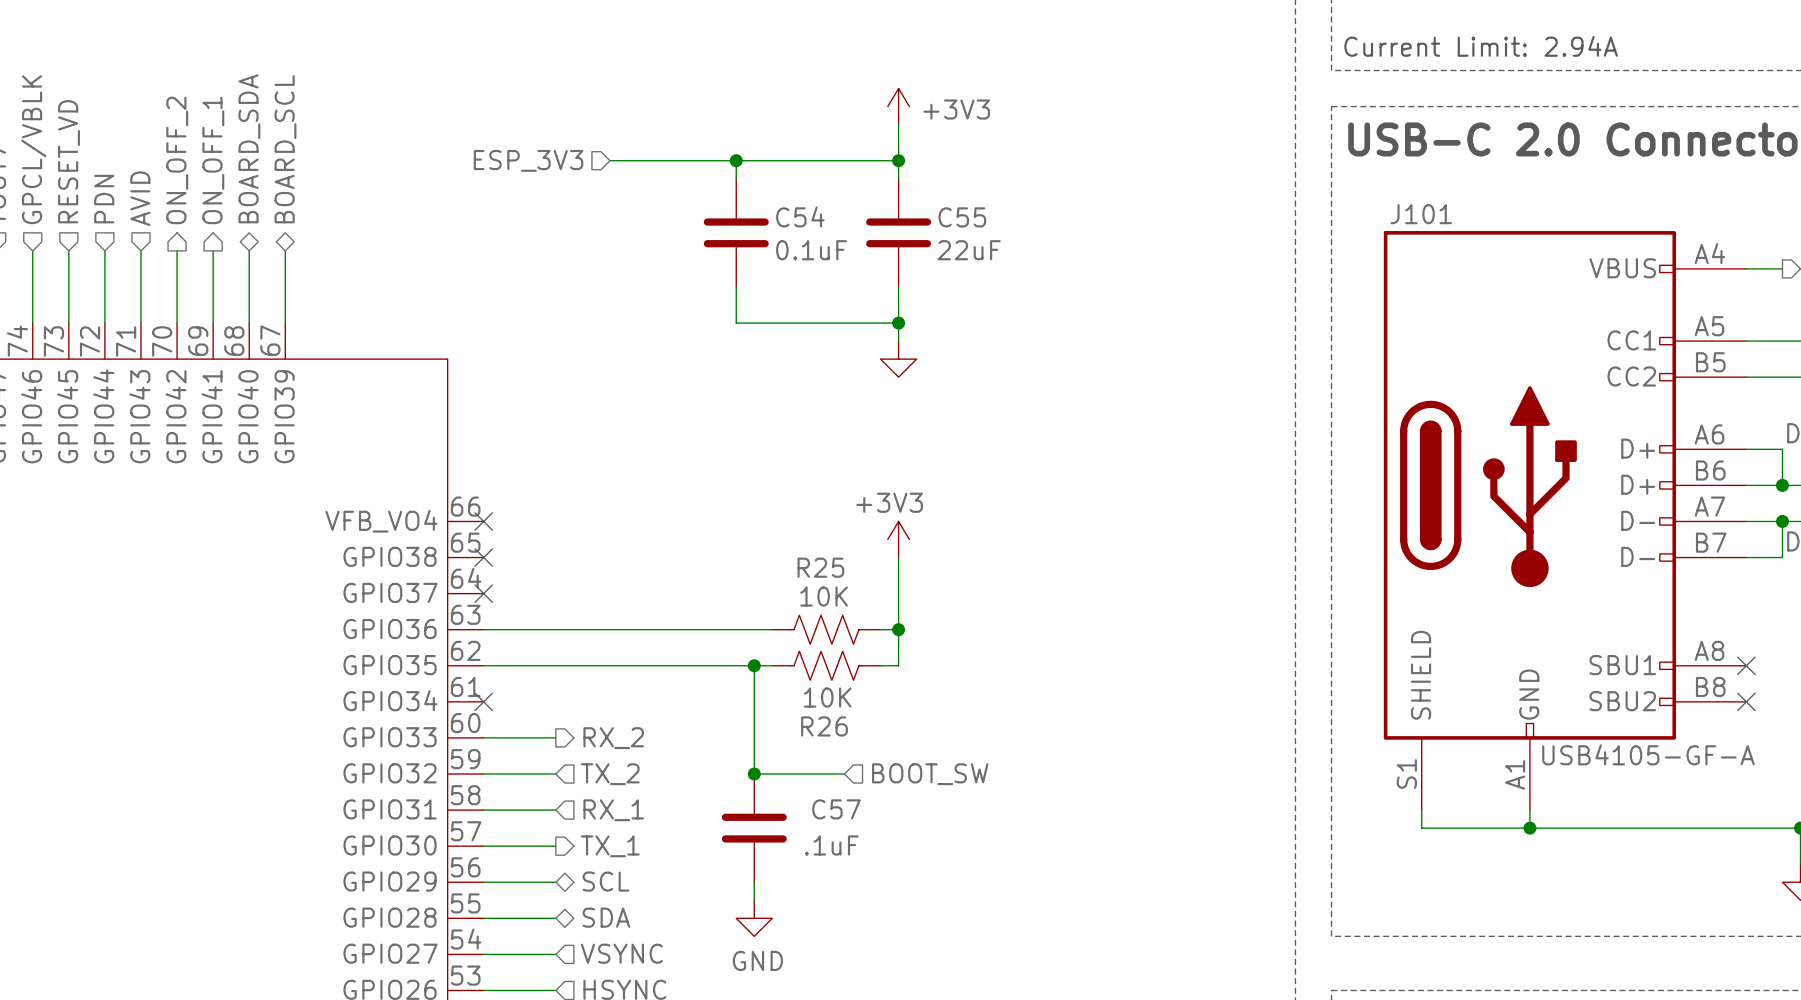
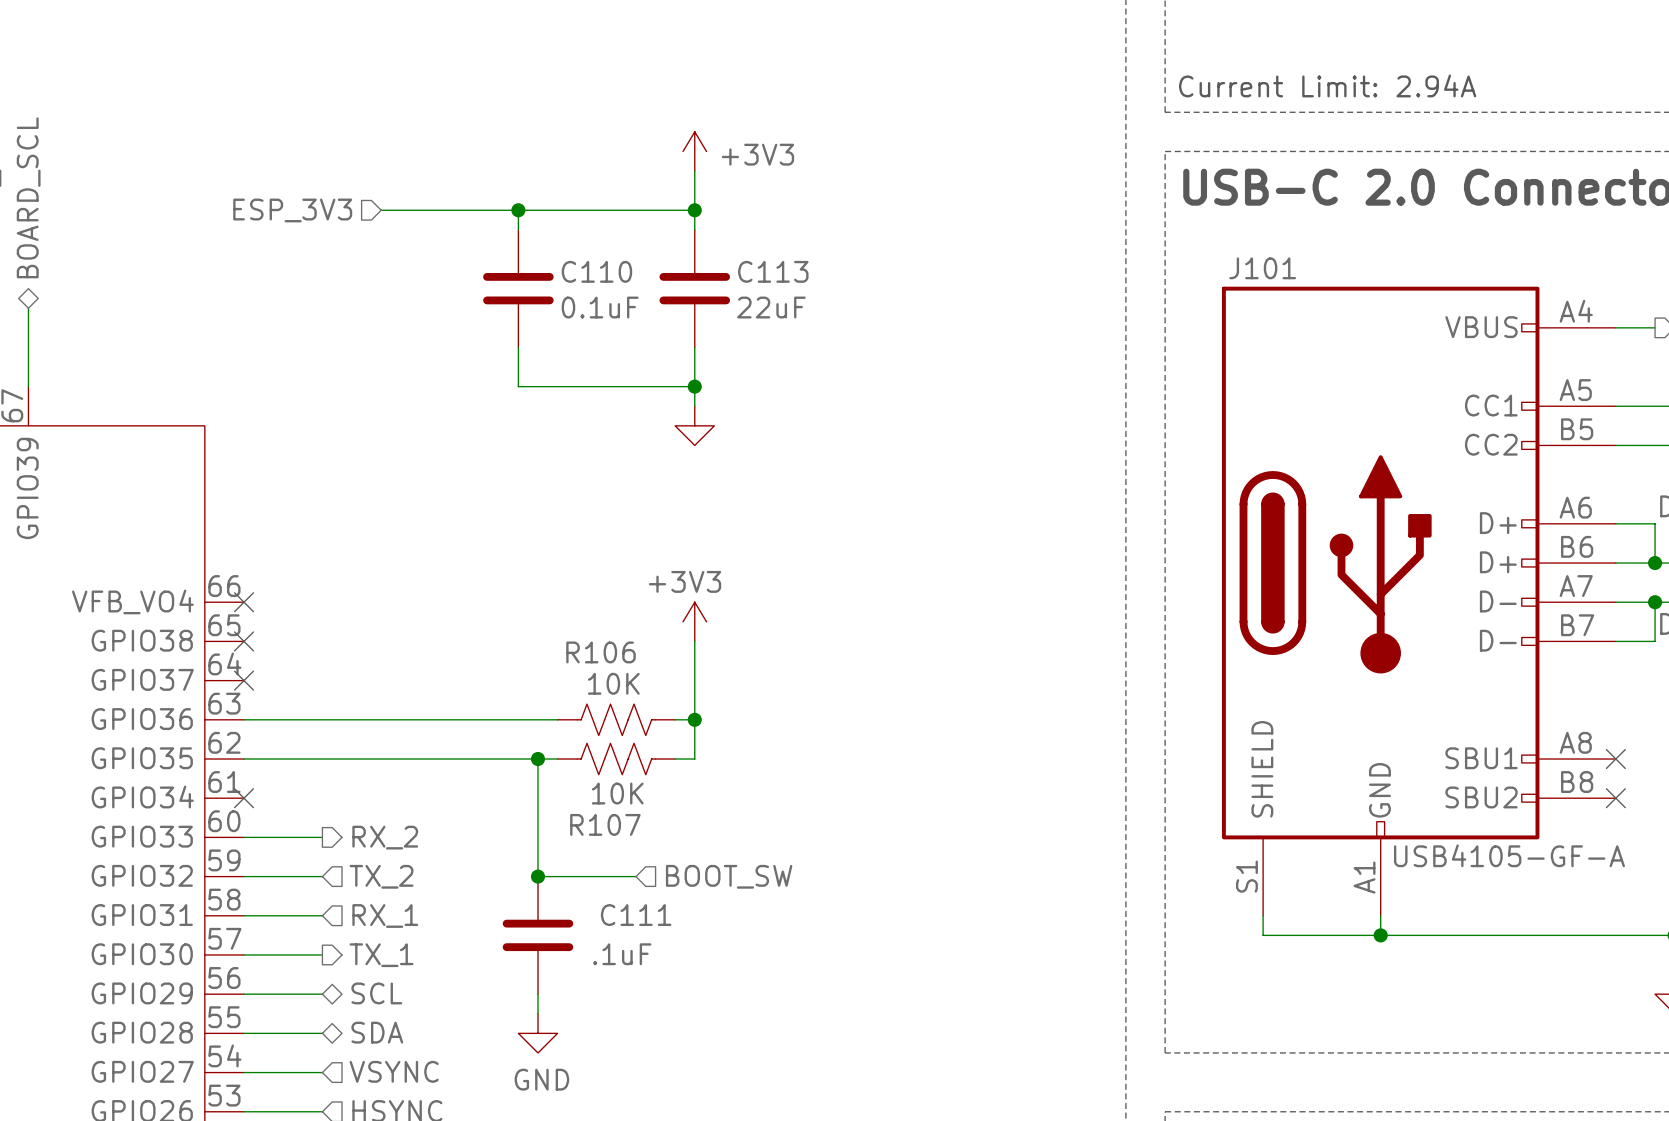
C54 name: C54 (800, 216) -> C110 (596, 271)
C55 name: C55 (962, 217) -> C113 (773, 271)
R25 name: R25 (820, 567) -> R106 (601, 652)
R26 name: R26 (824, 726) -> R107 (605, 824)
C57 name: C57 (836, 809) -> C111 (636, 915)

